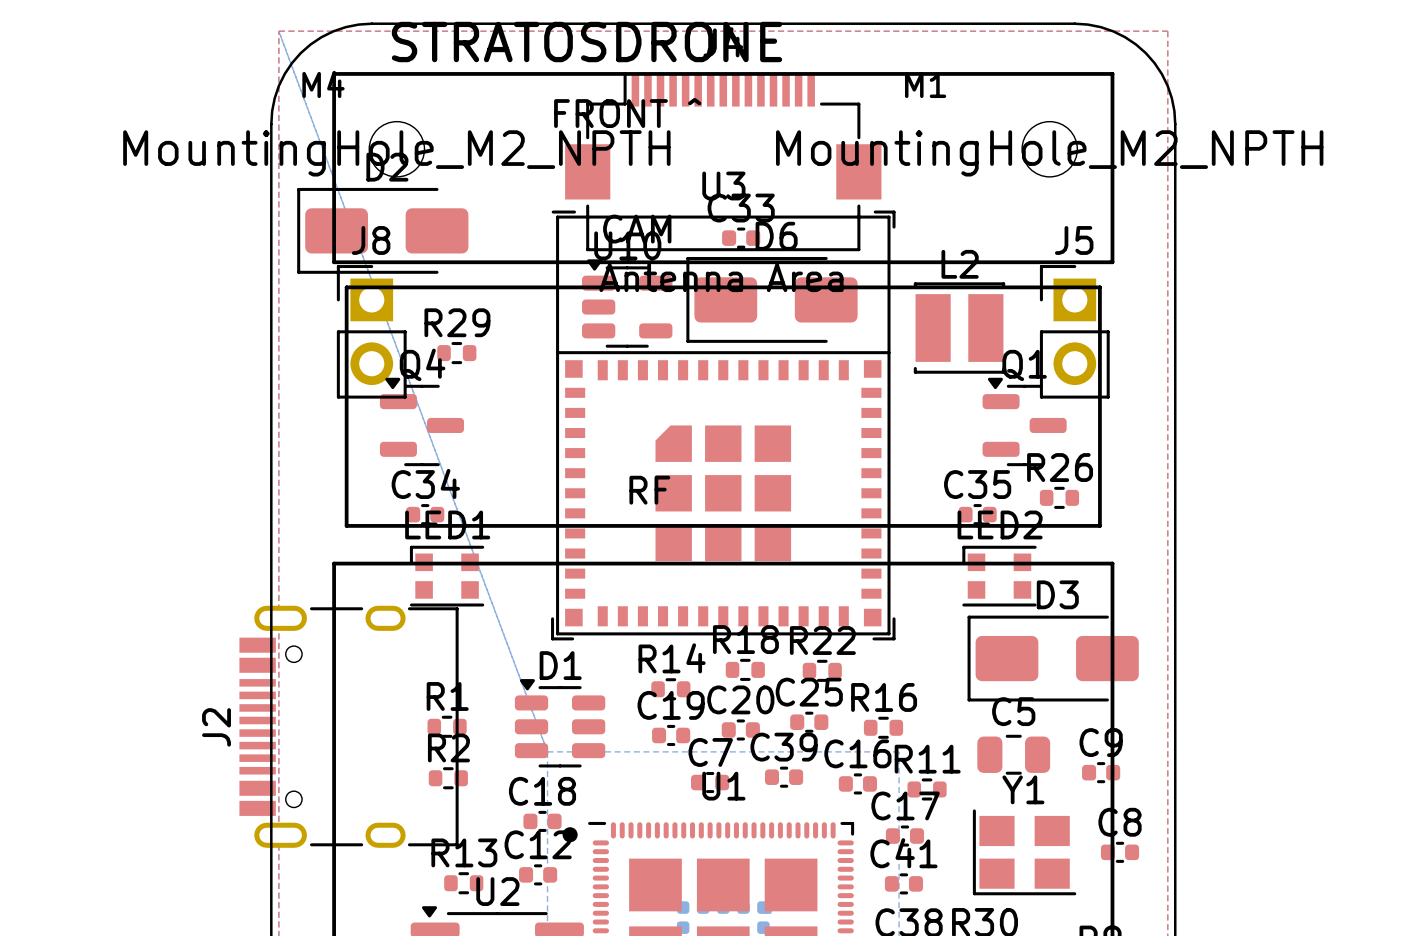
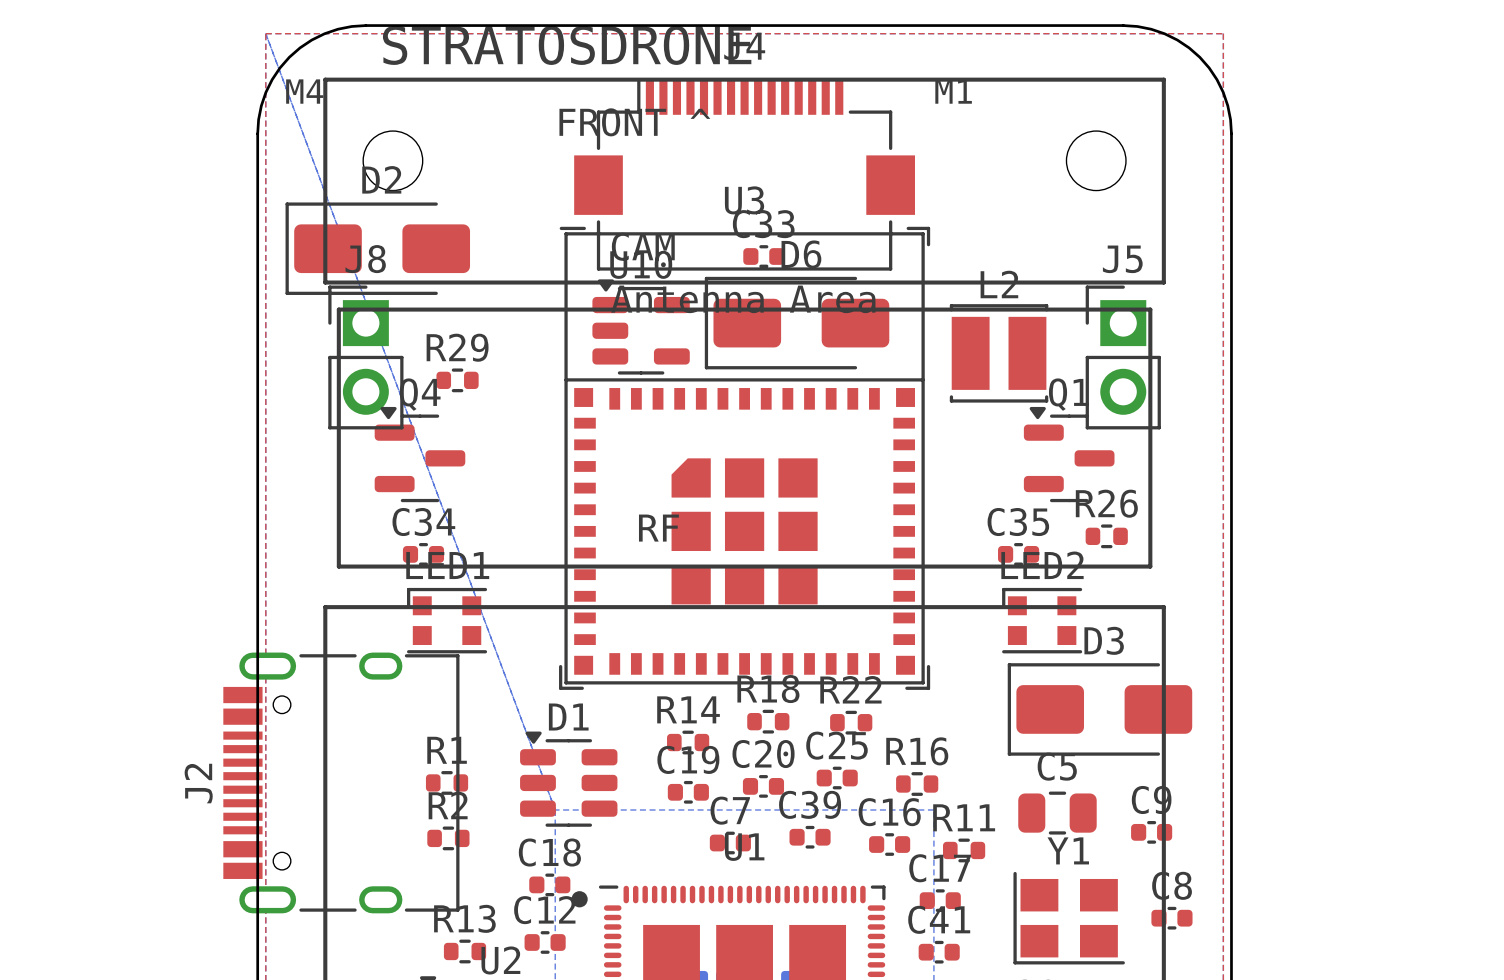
part value: MountingHole_M2_NPTH (396, 153) -> none
part value: MountingHole_M2_NPTH (1049, 153) -> none

